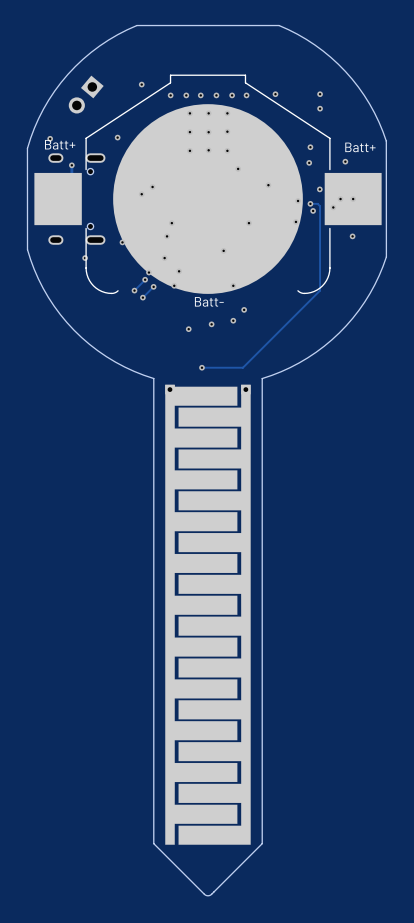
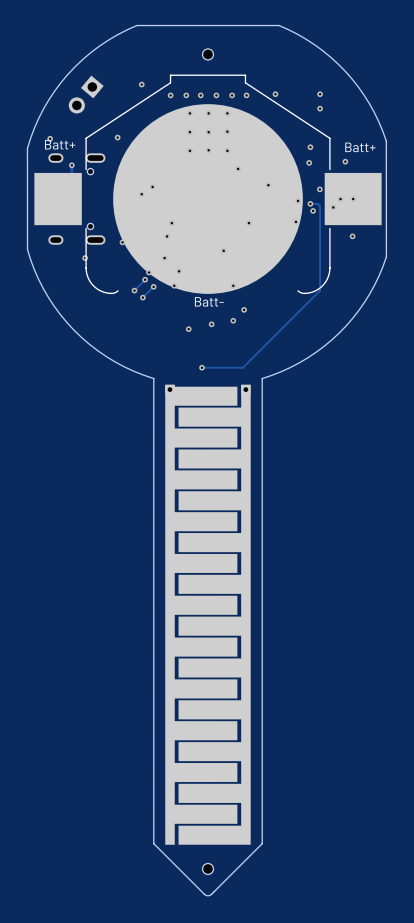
part: none -> (208, 54)
part: none -> (208, 868)

